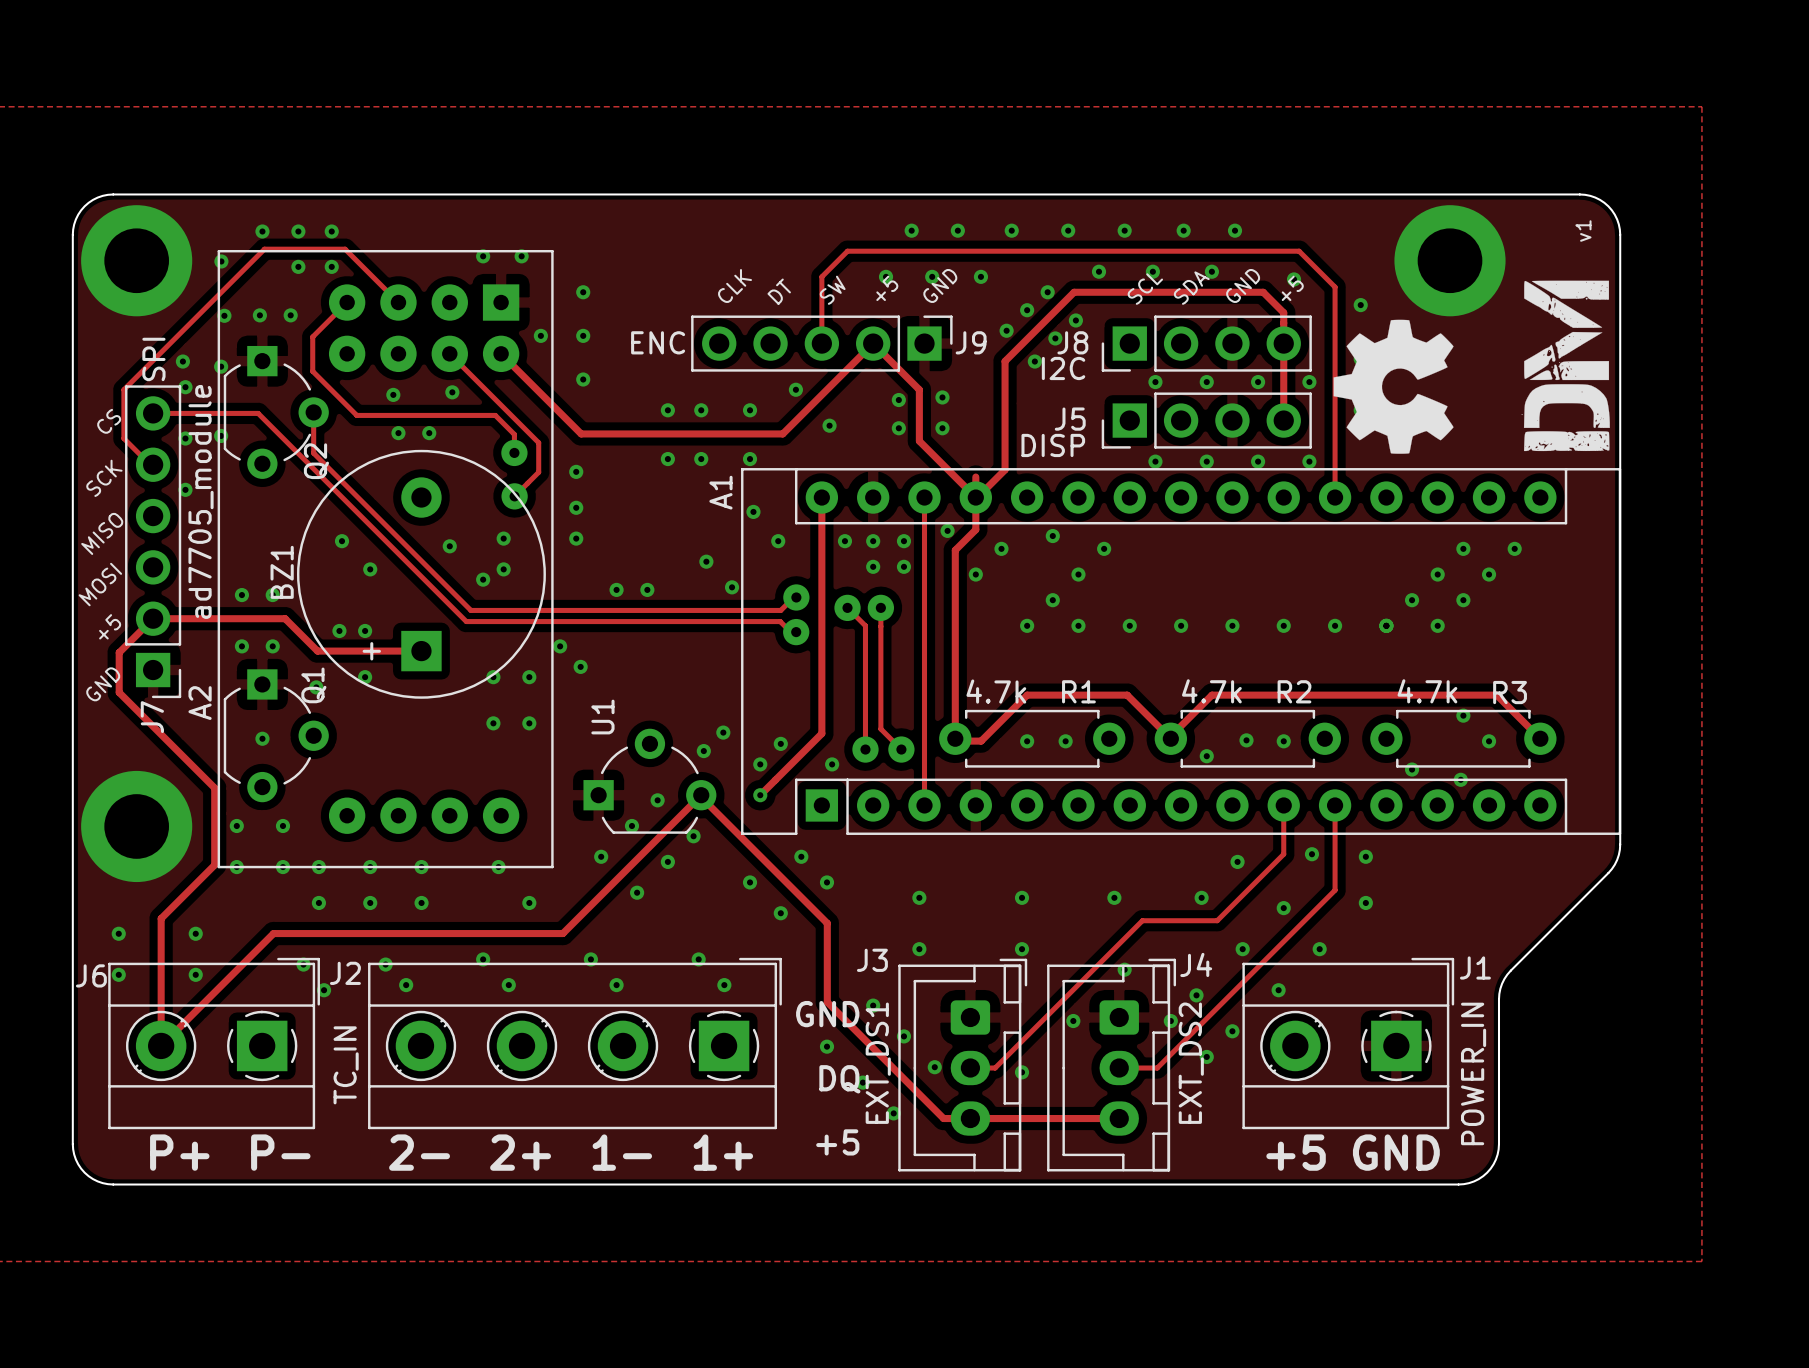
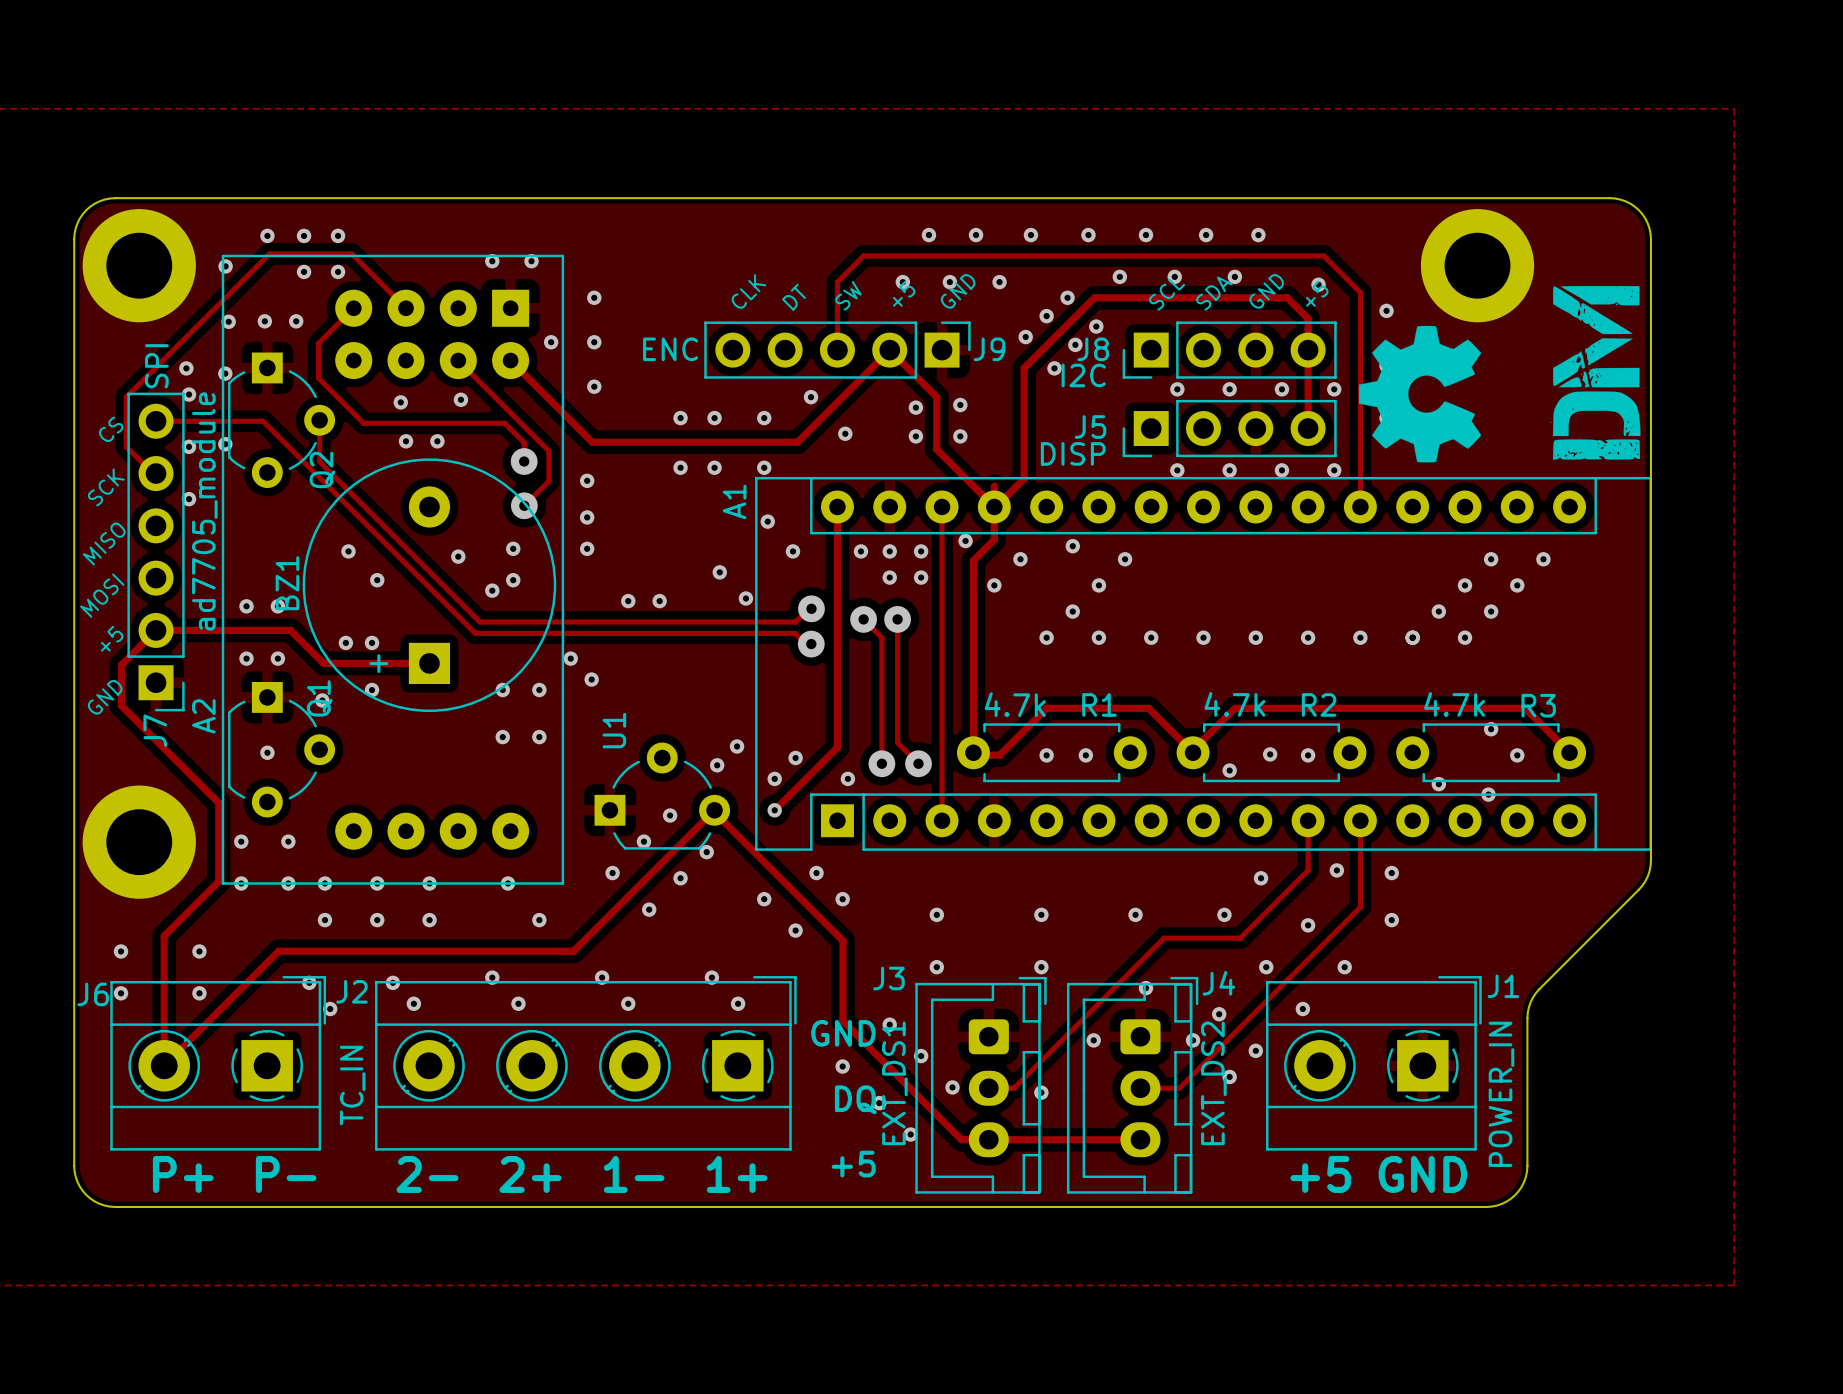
text: v1 (1583, 231) -> none

